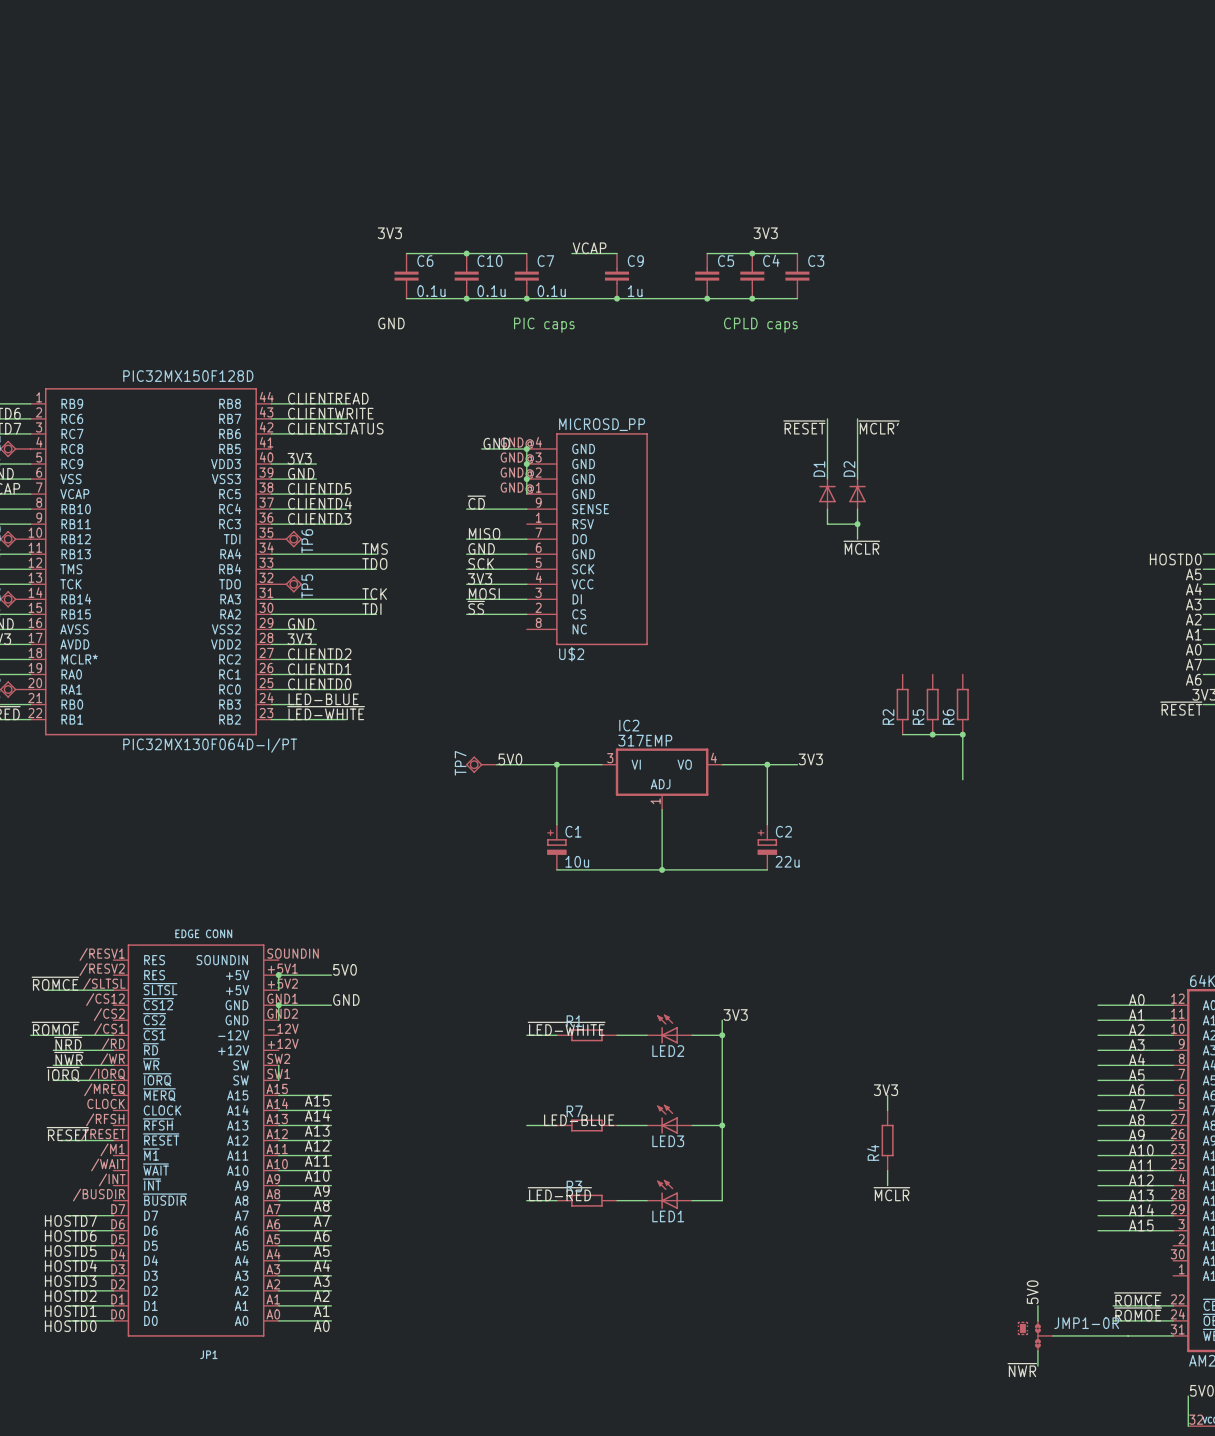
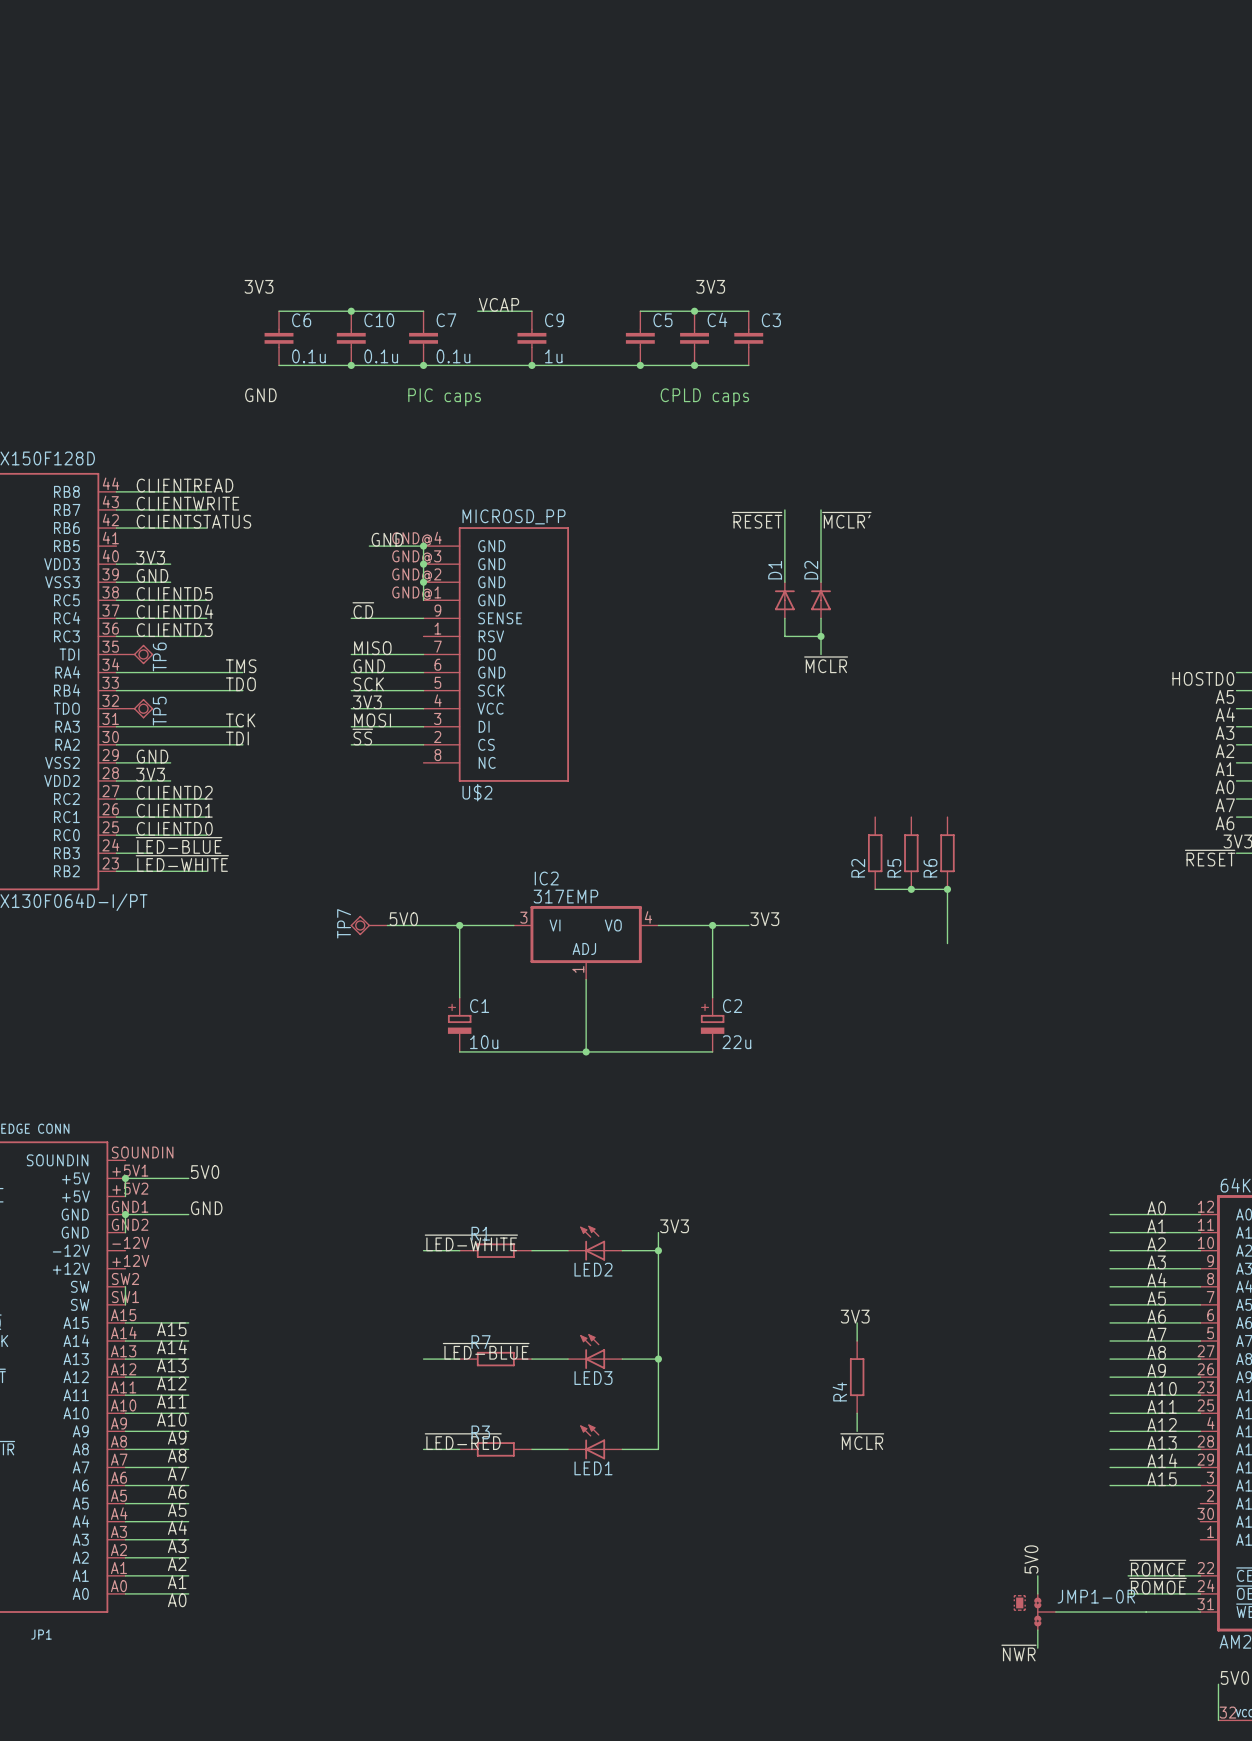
label: LED-BLUE (323, 699) -> ~{LED-BLUE} (179, 845)
label: LED-BLUE (579, 1120) -> ~{LED-BLUE} (486, 1351)

